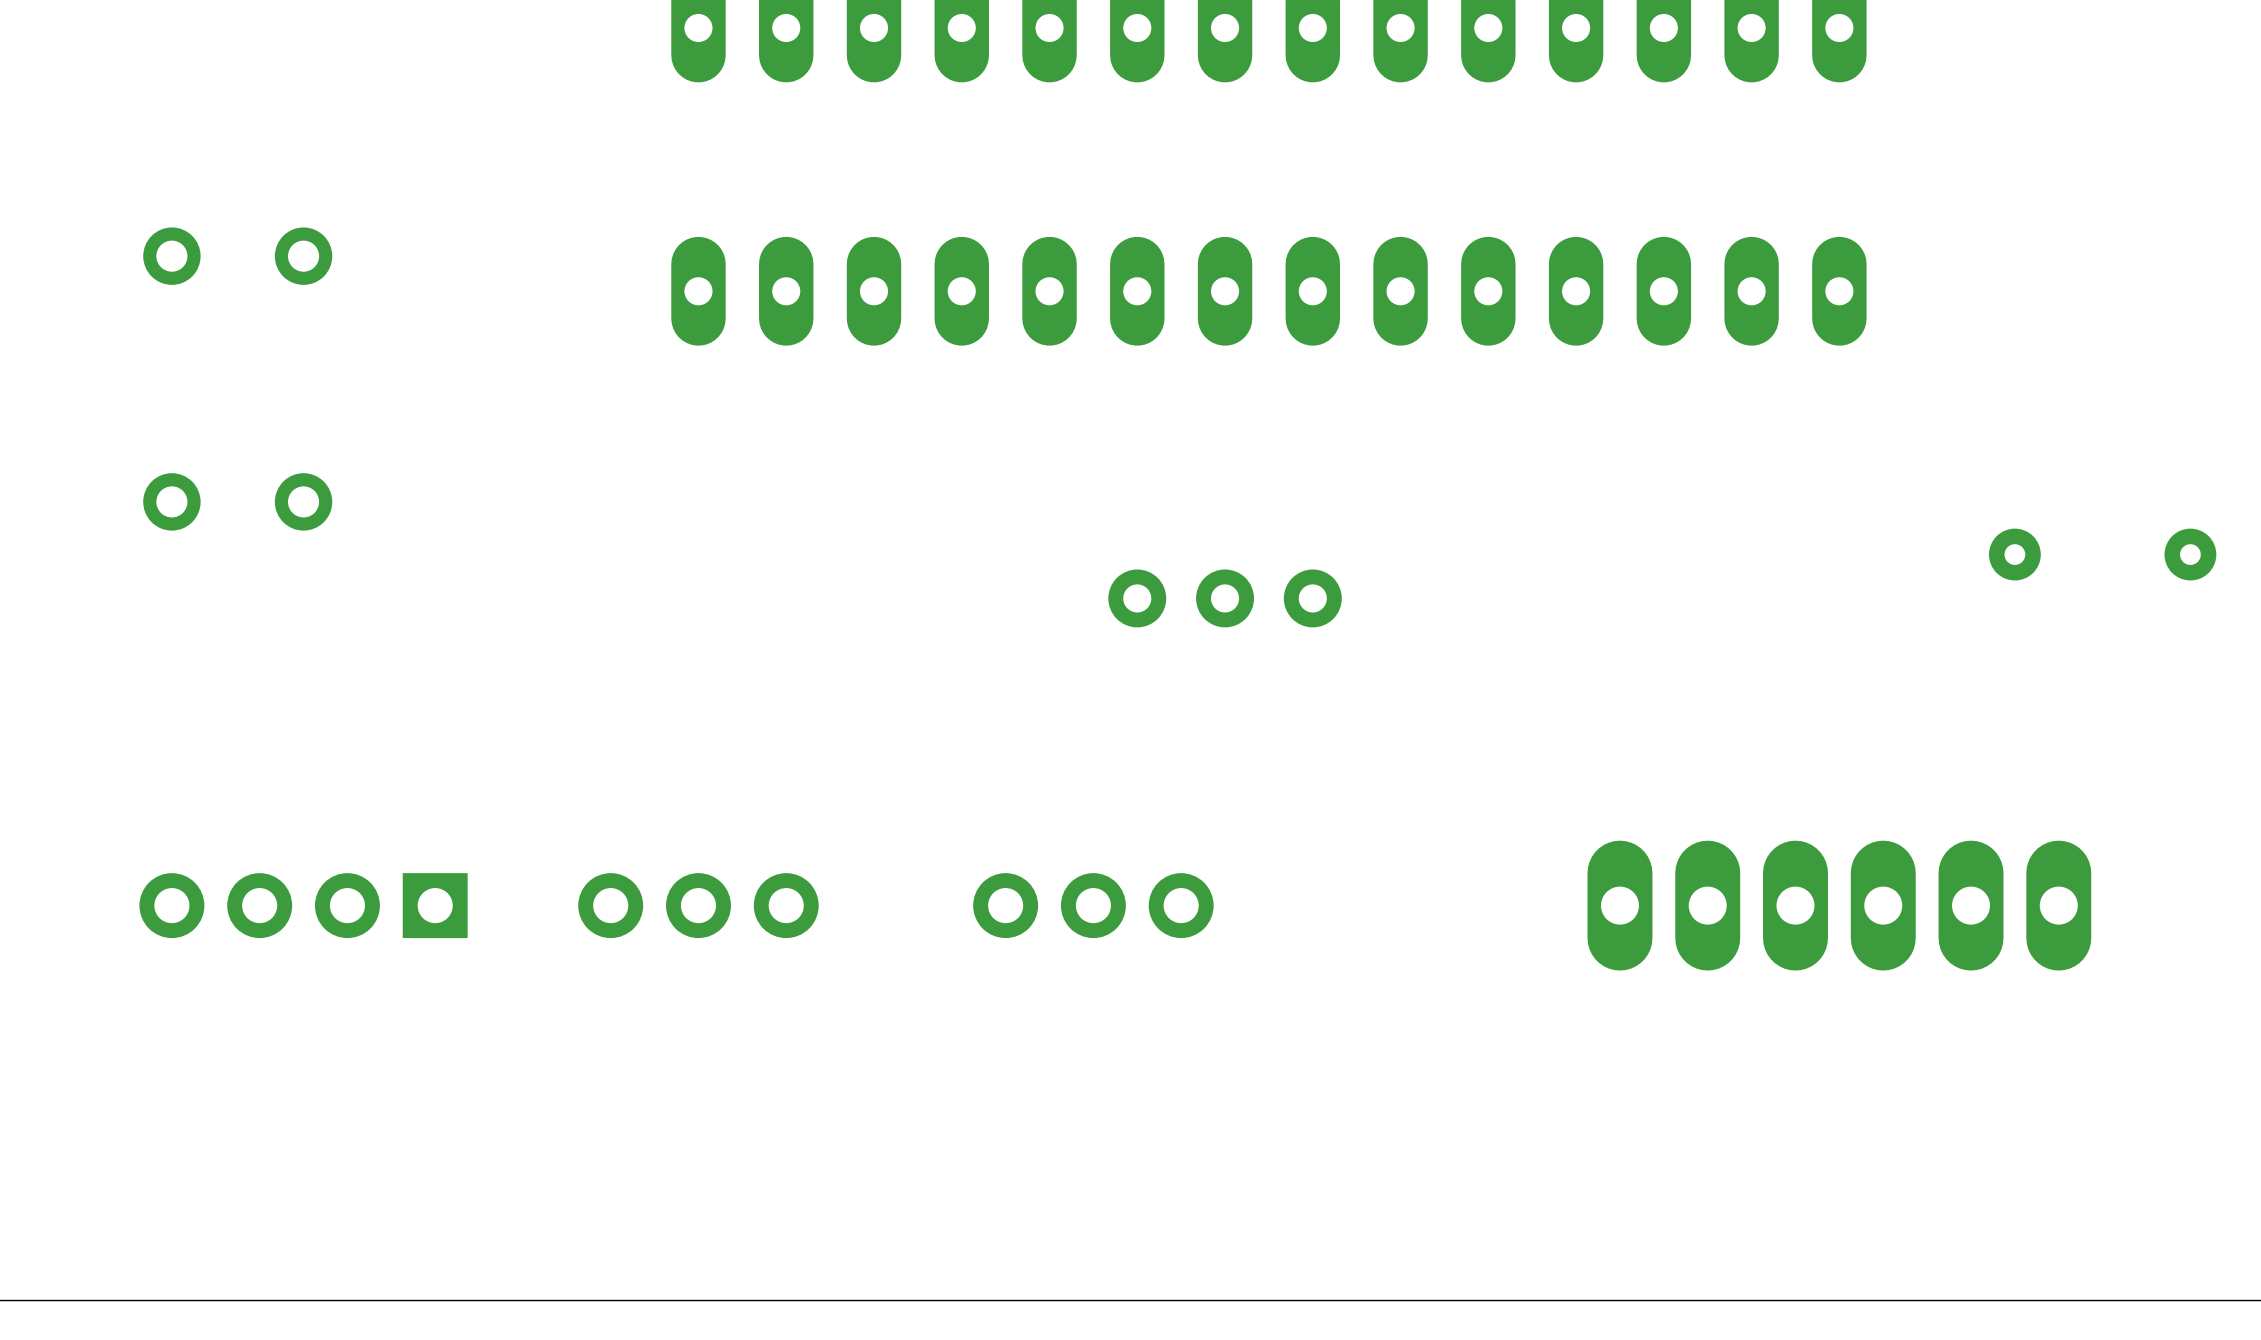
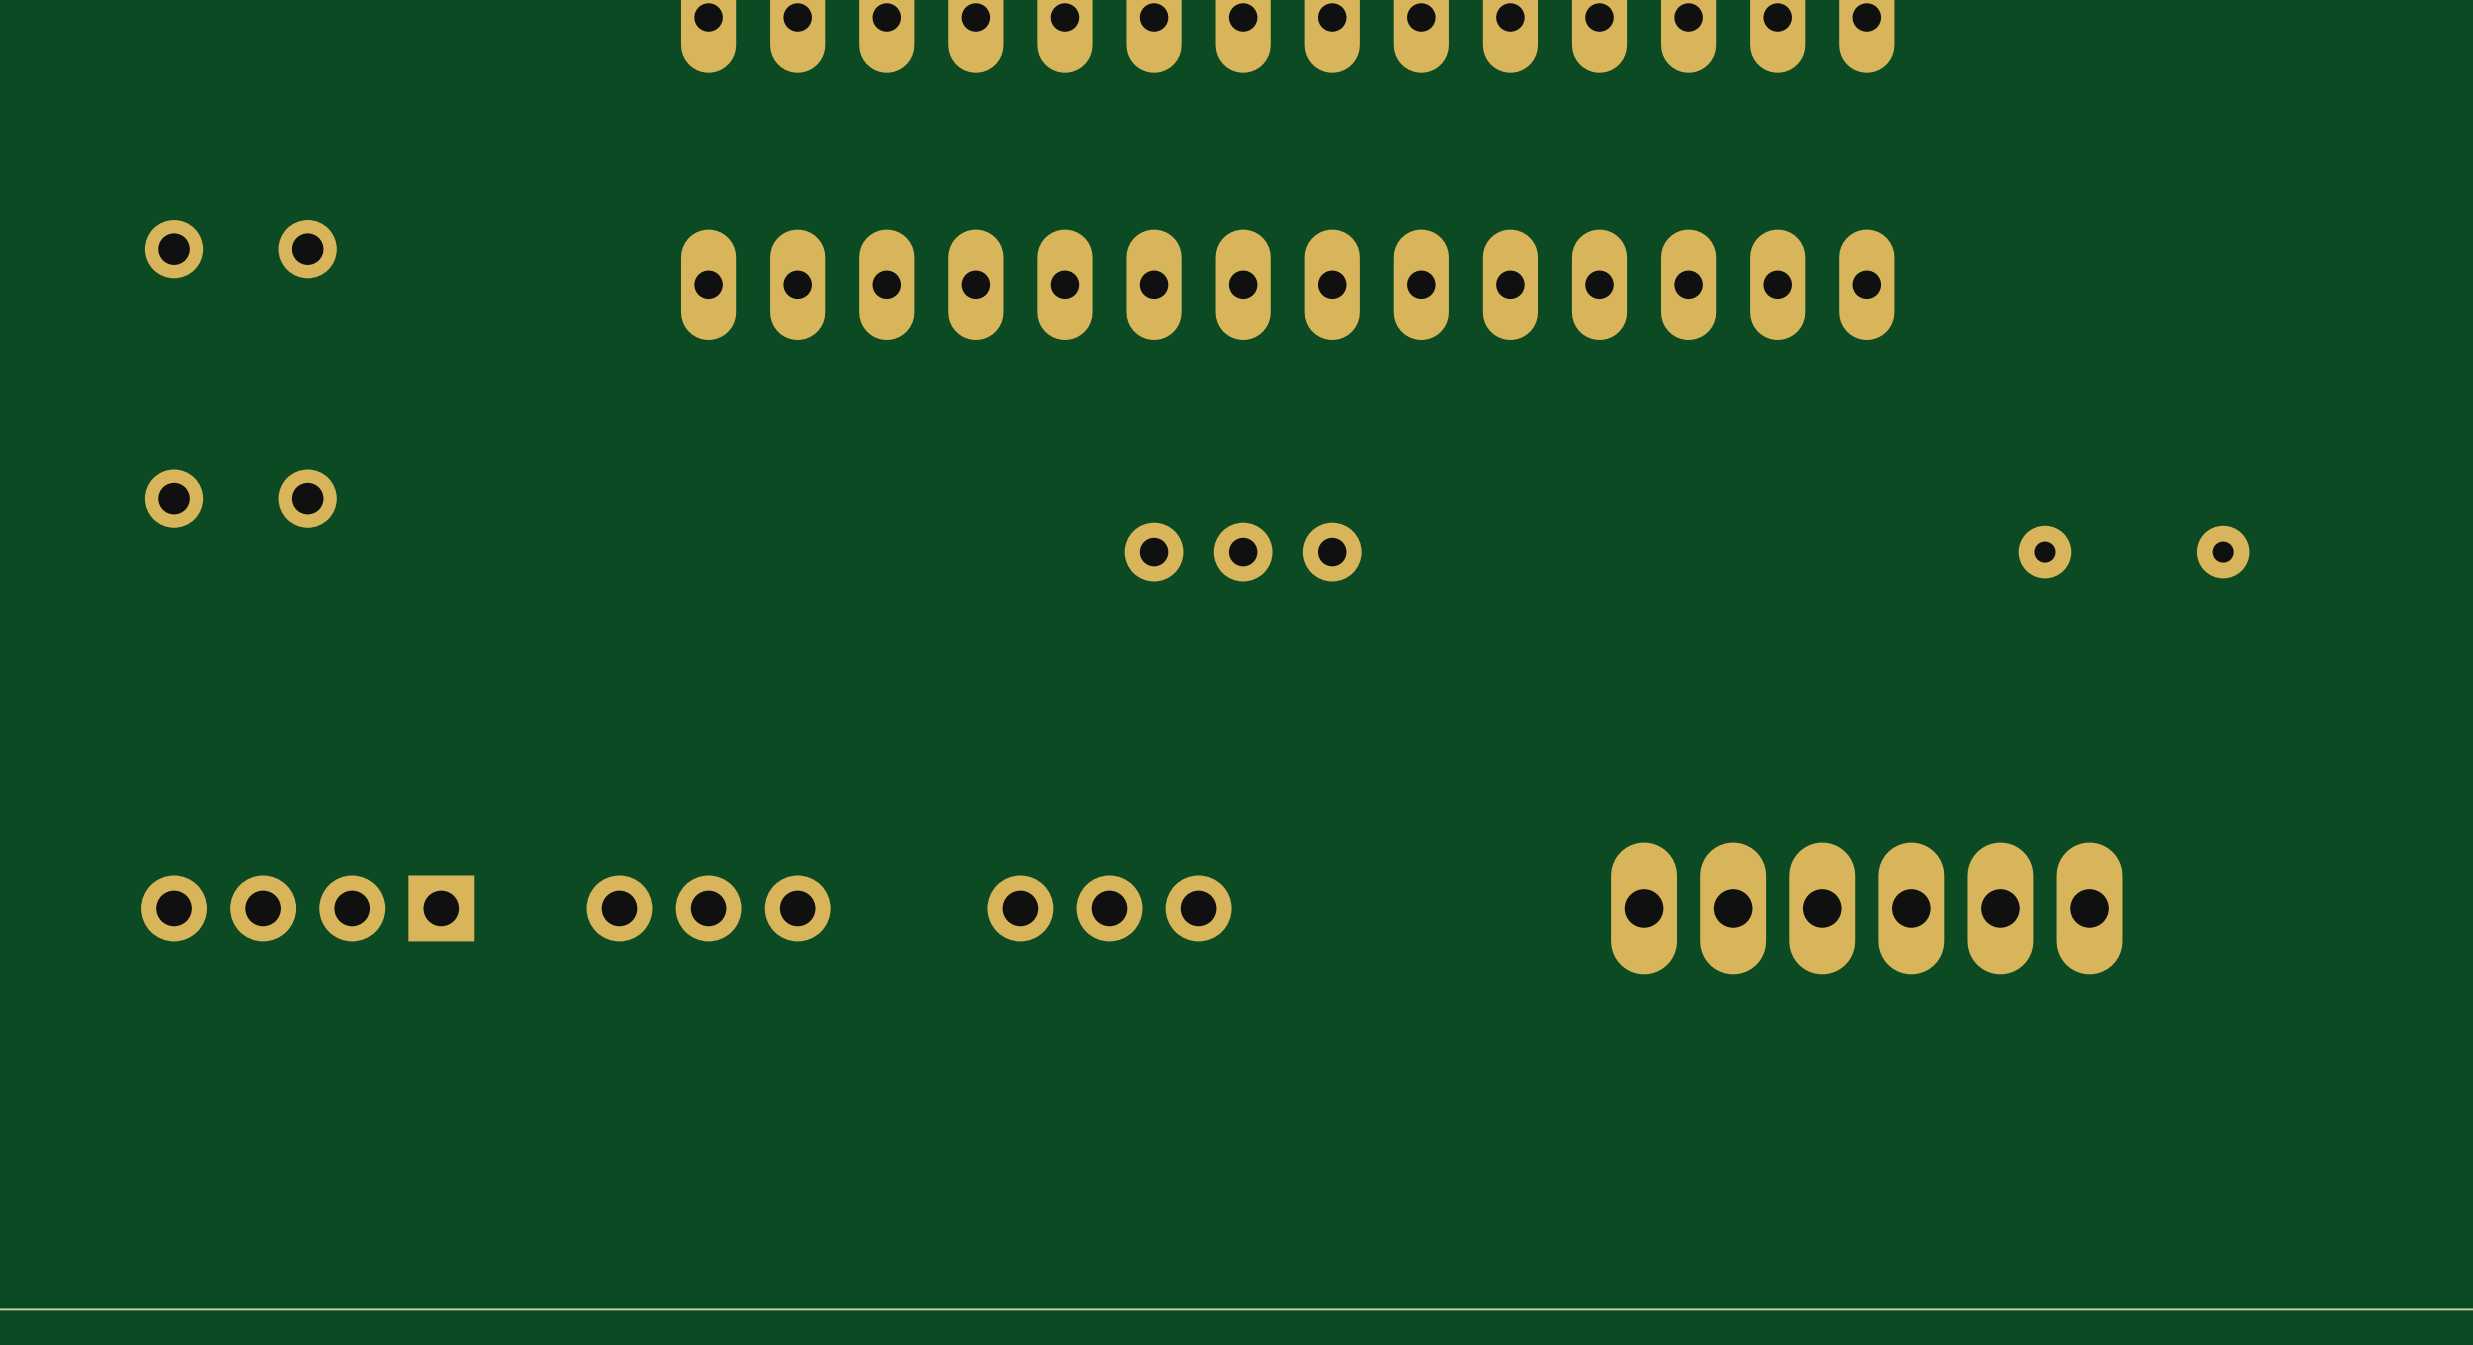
part position: (1225, 598) -> (1243, 552)

